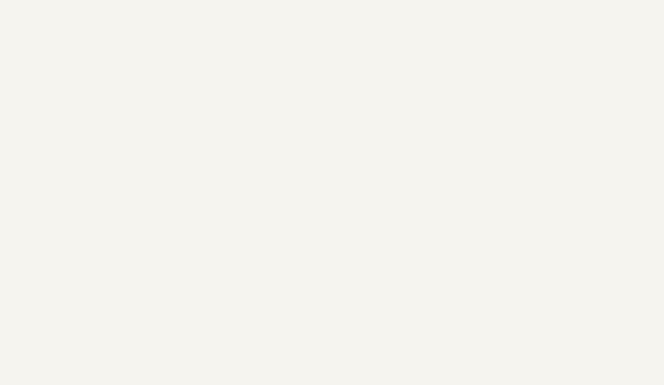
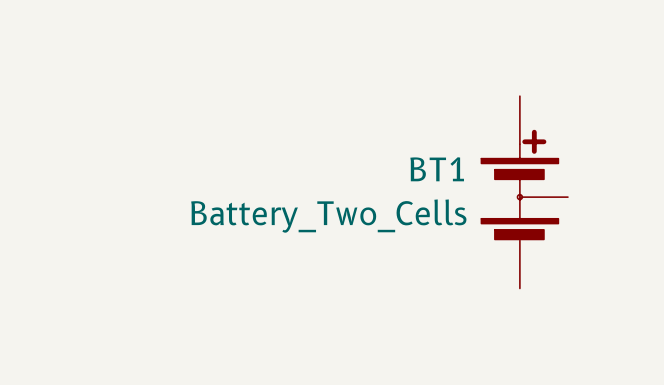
BT1: none -> Battery_Two_Cells (524, 192)

